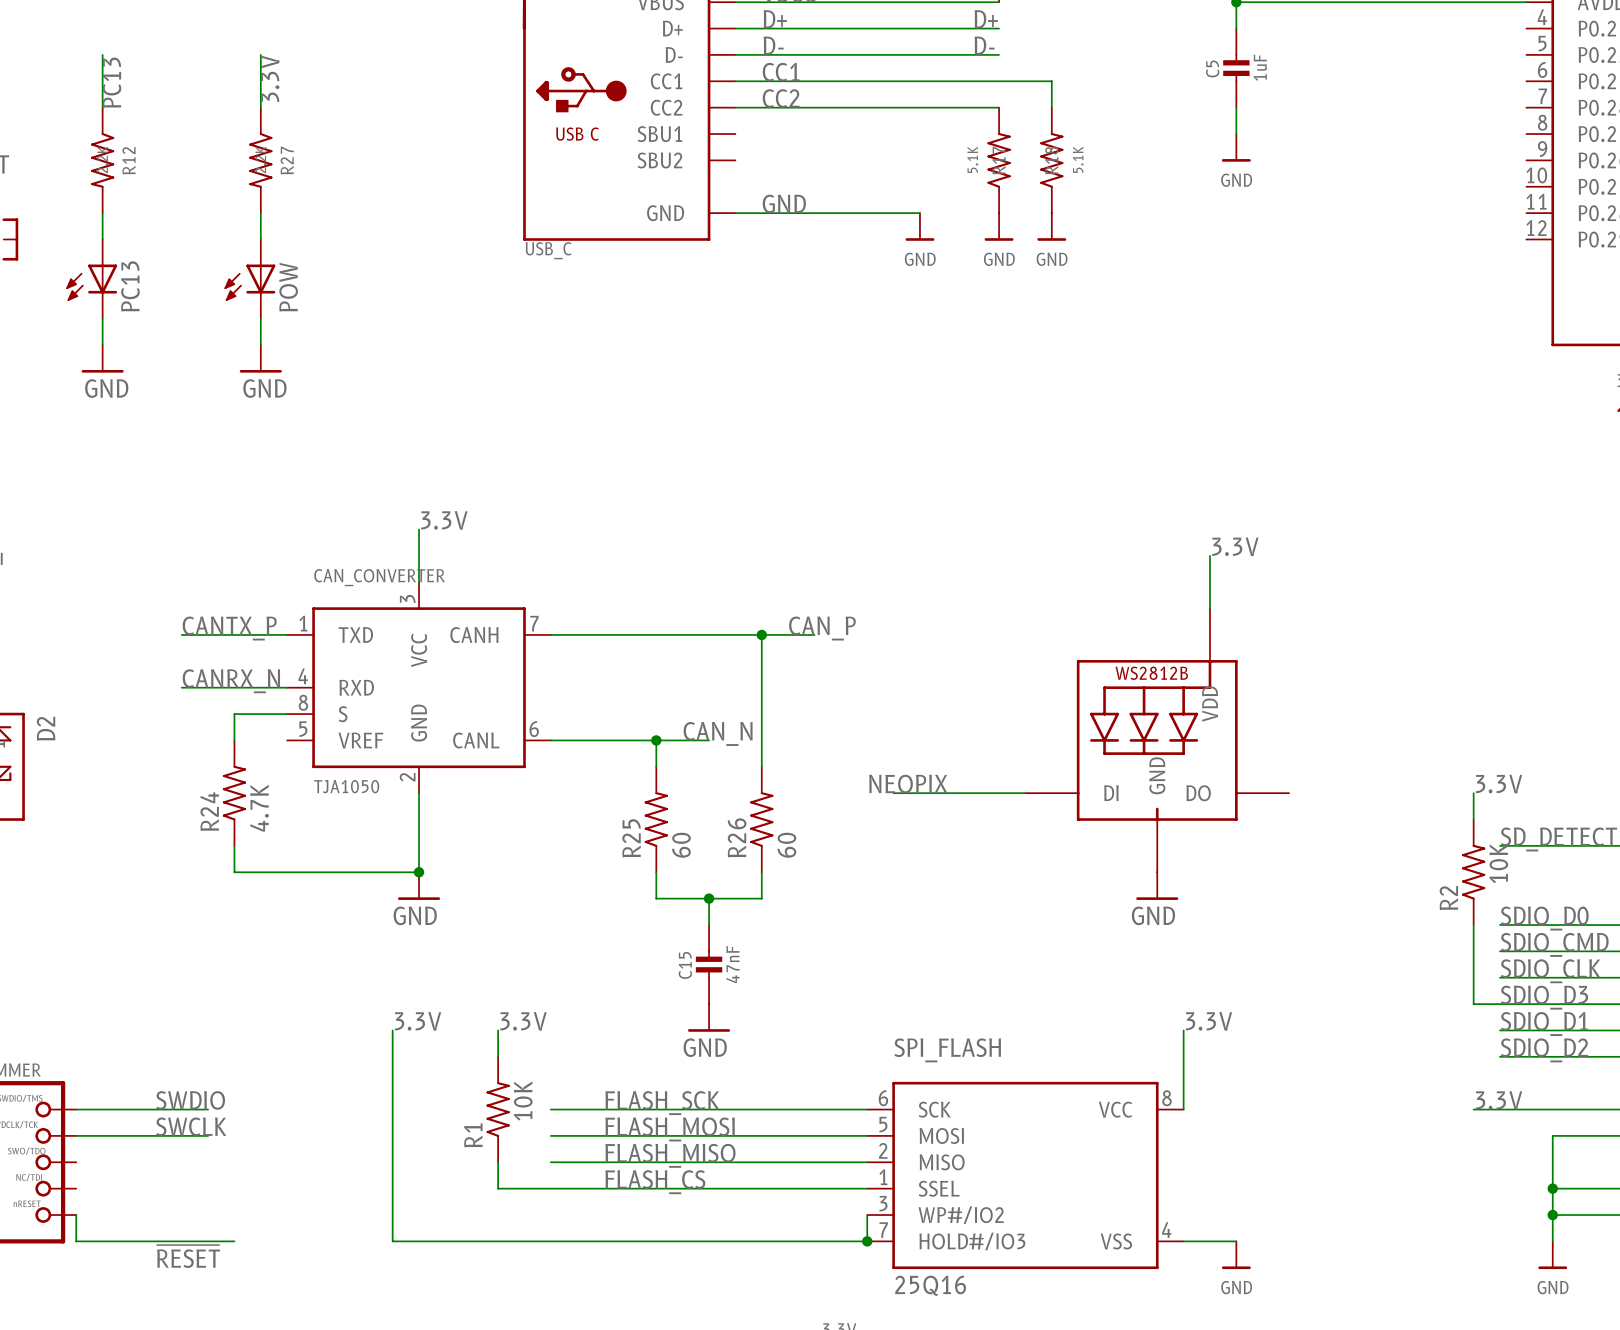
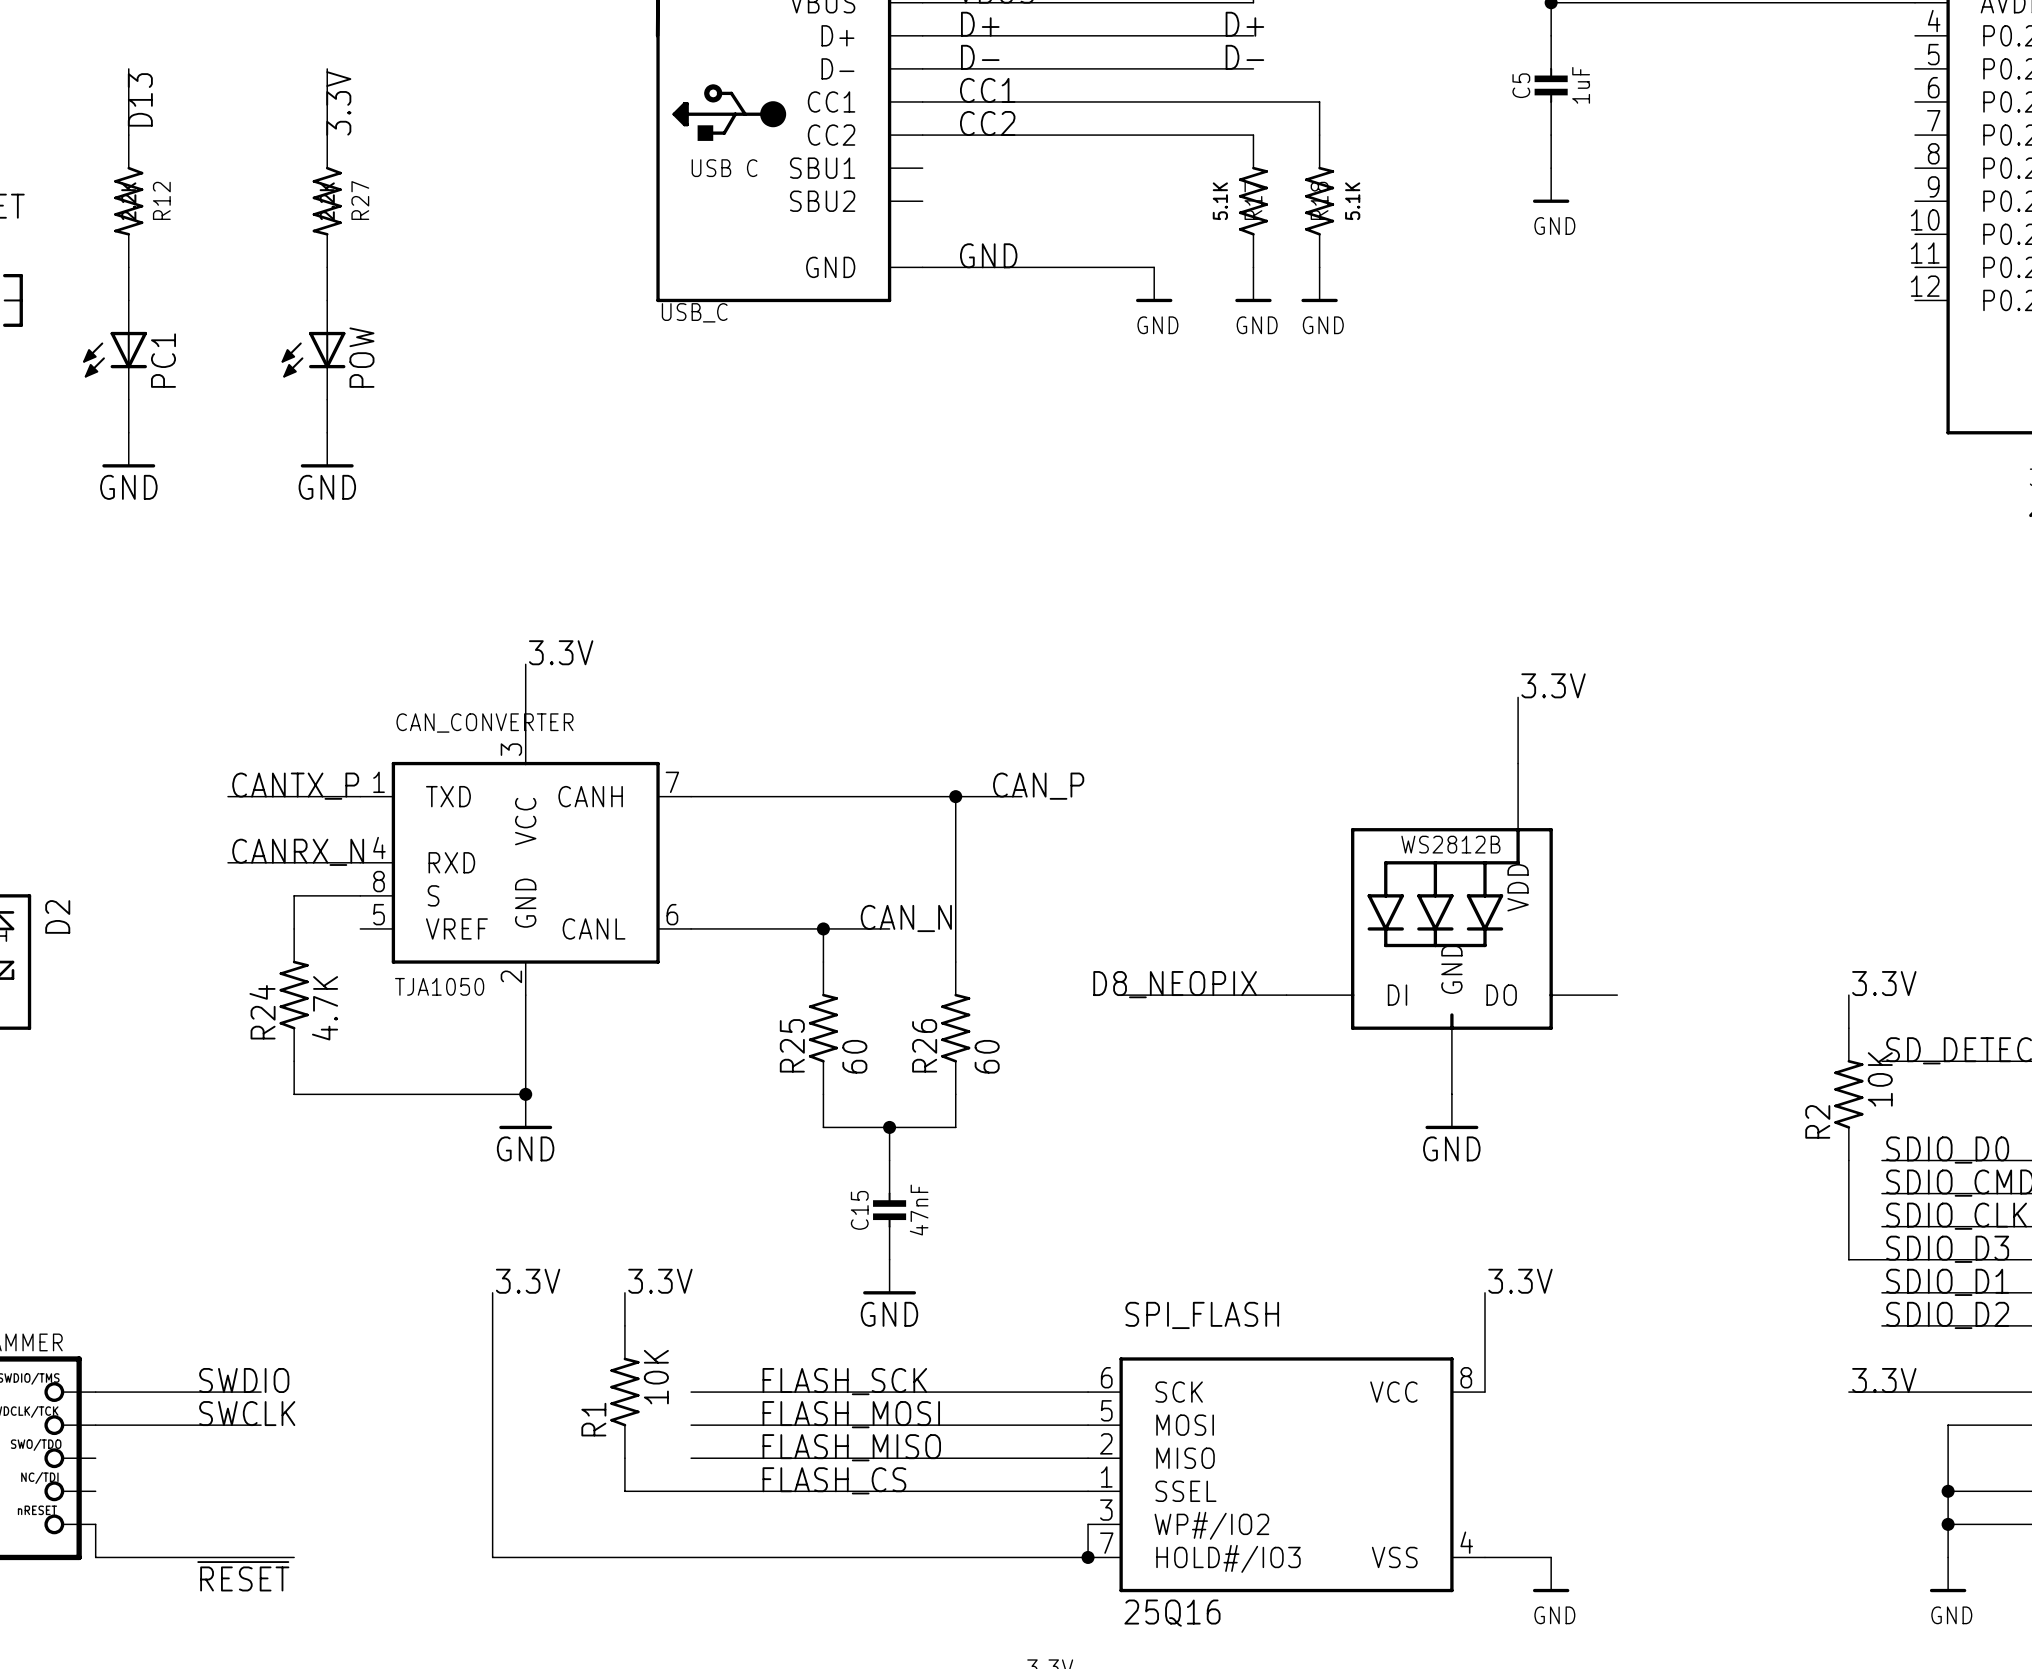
label: PC13 (111, 82) -> D13 (140, 99)
PC13 name: PC13 (130, 286) -> PC1 (163, 360)
label: NEOPIX (908, 784) -> D8_NEOPIX (1175, 984)

